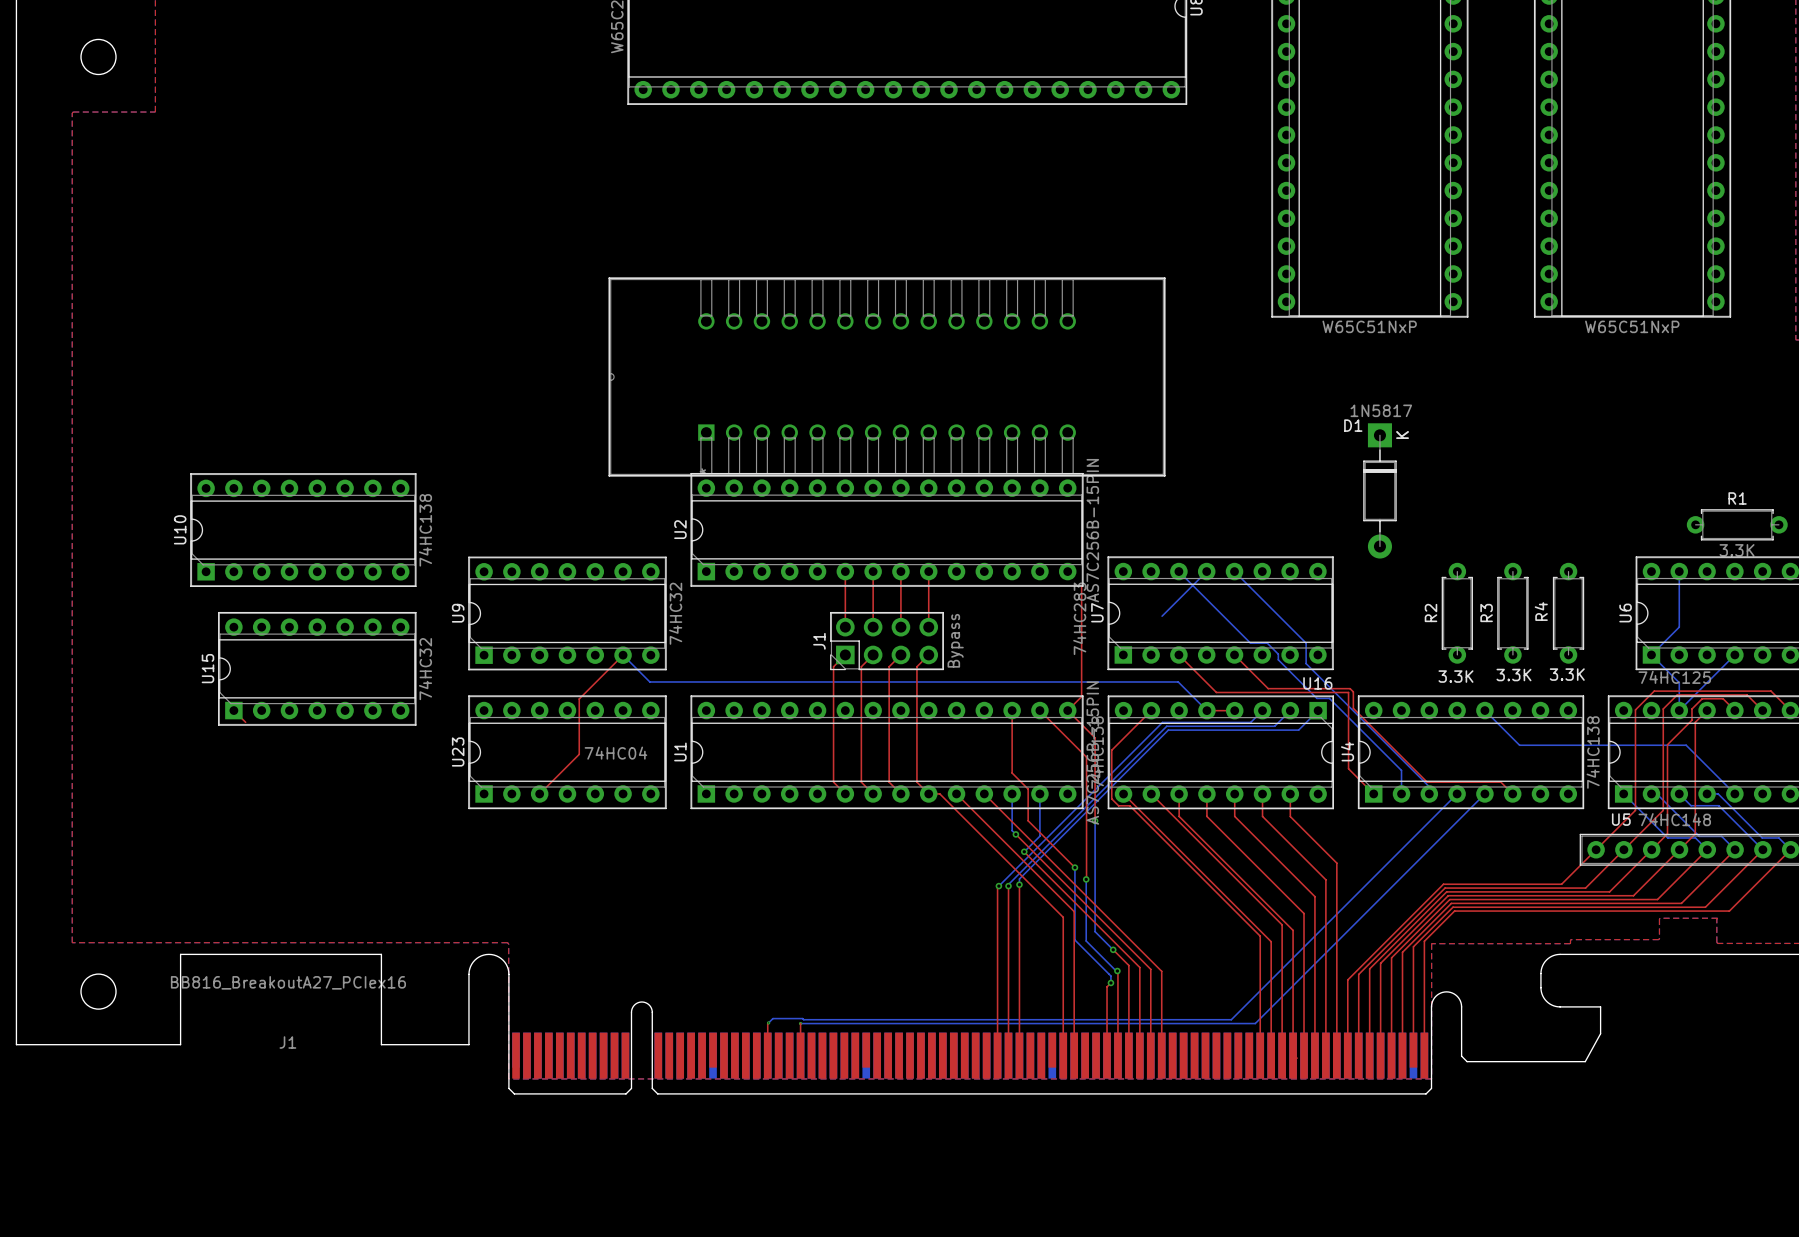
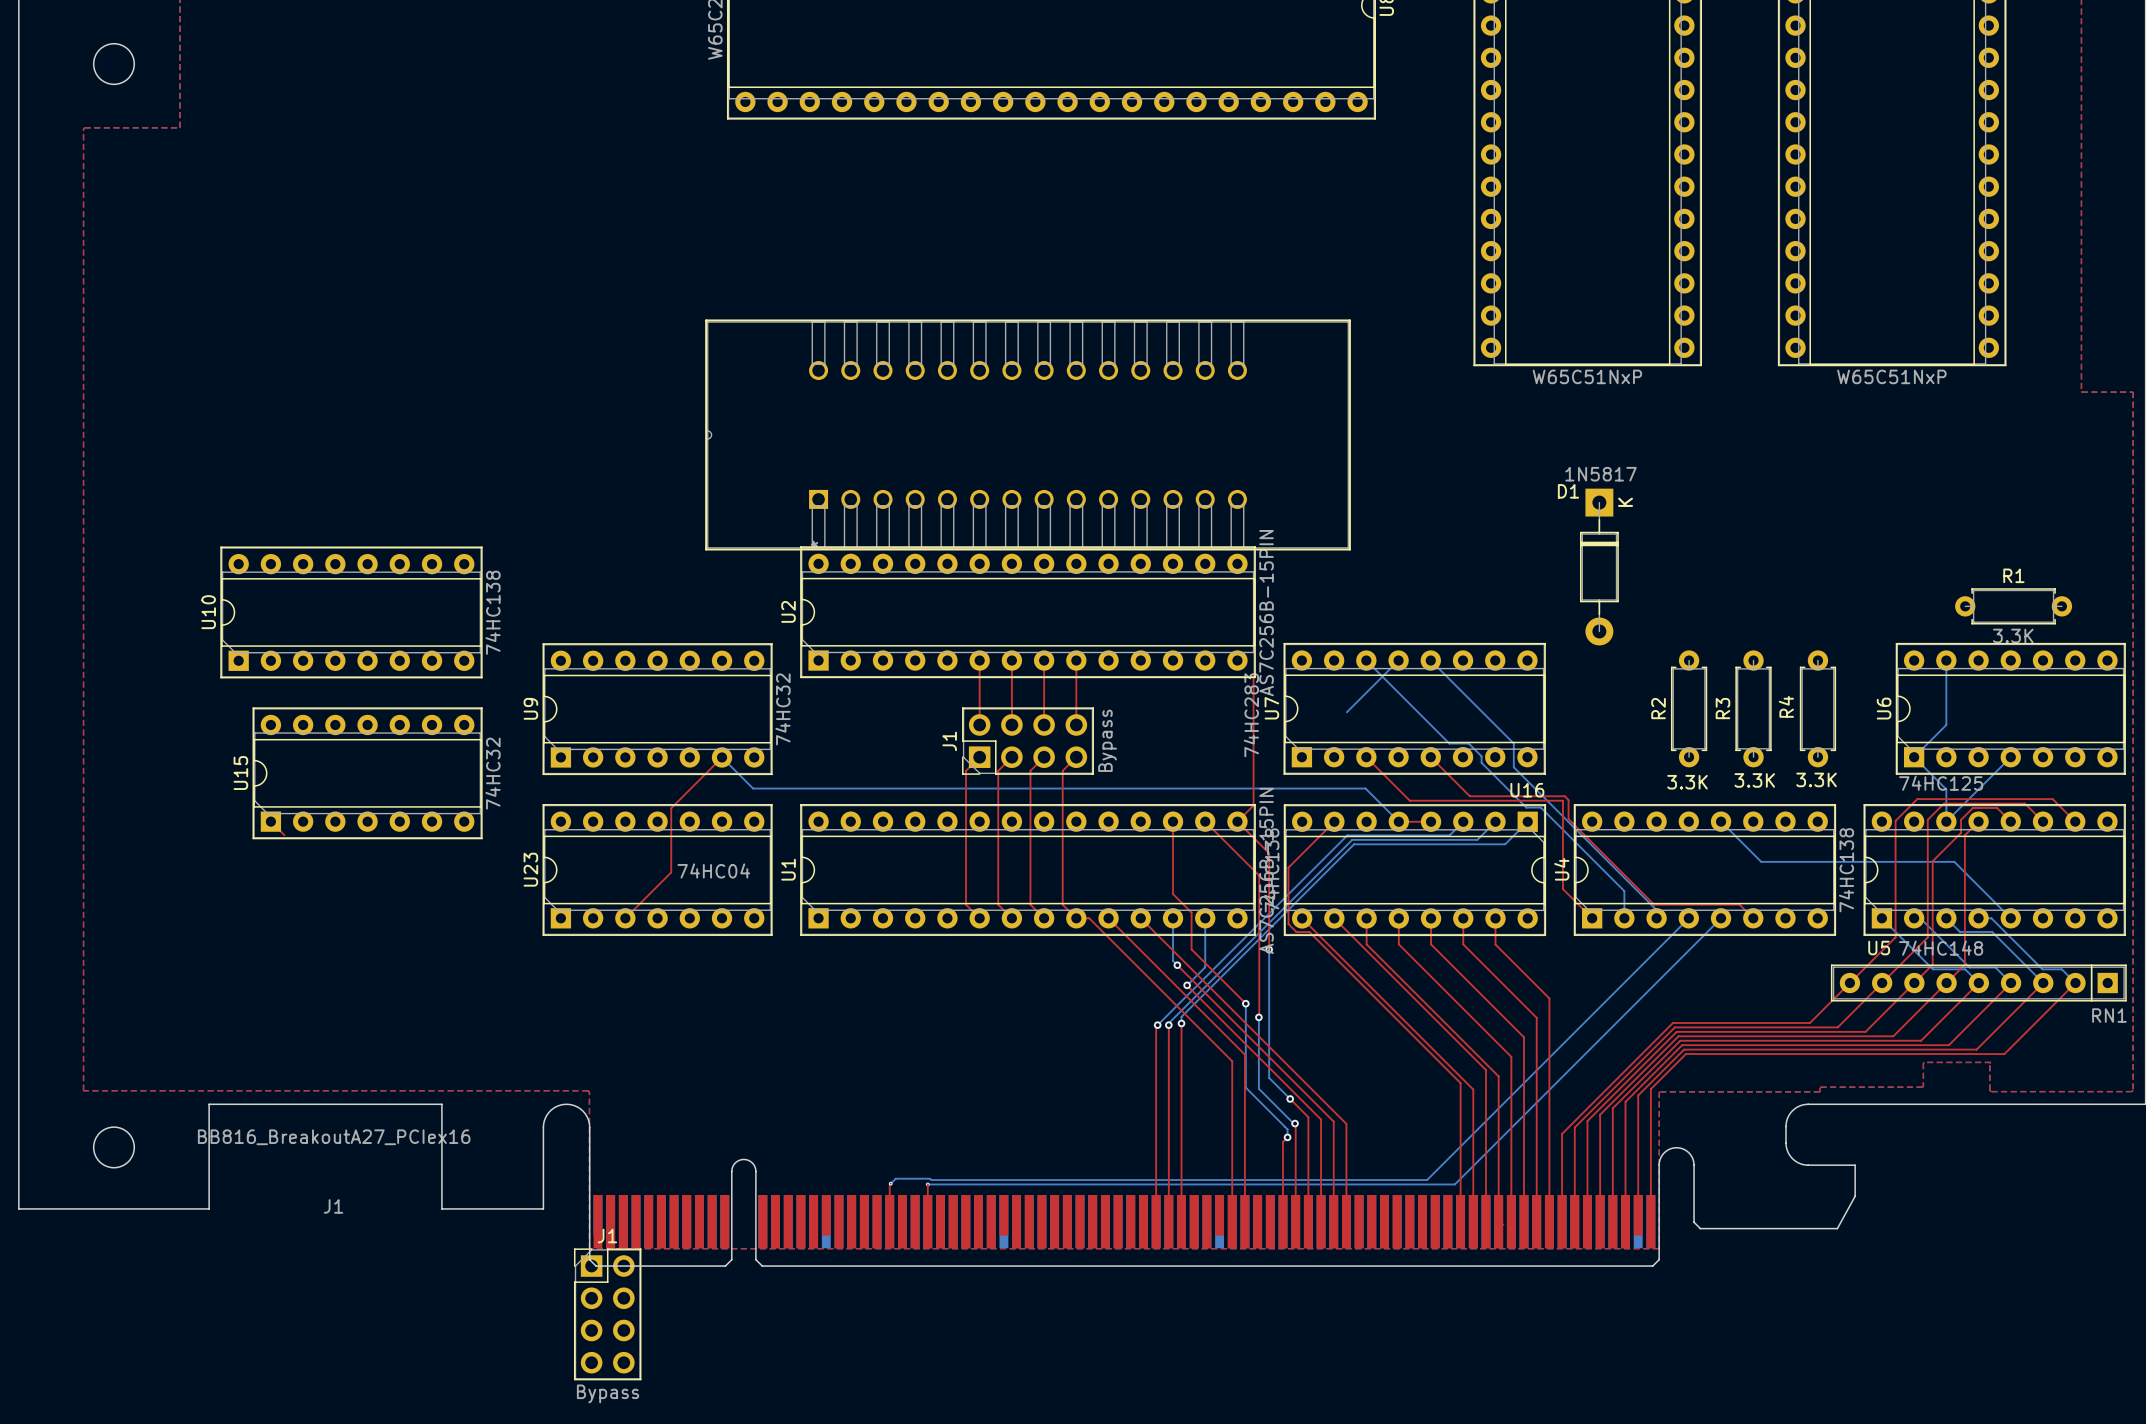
J1: none -> Bypass (607, 1314)

